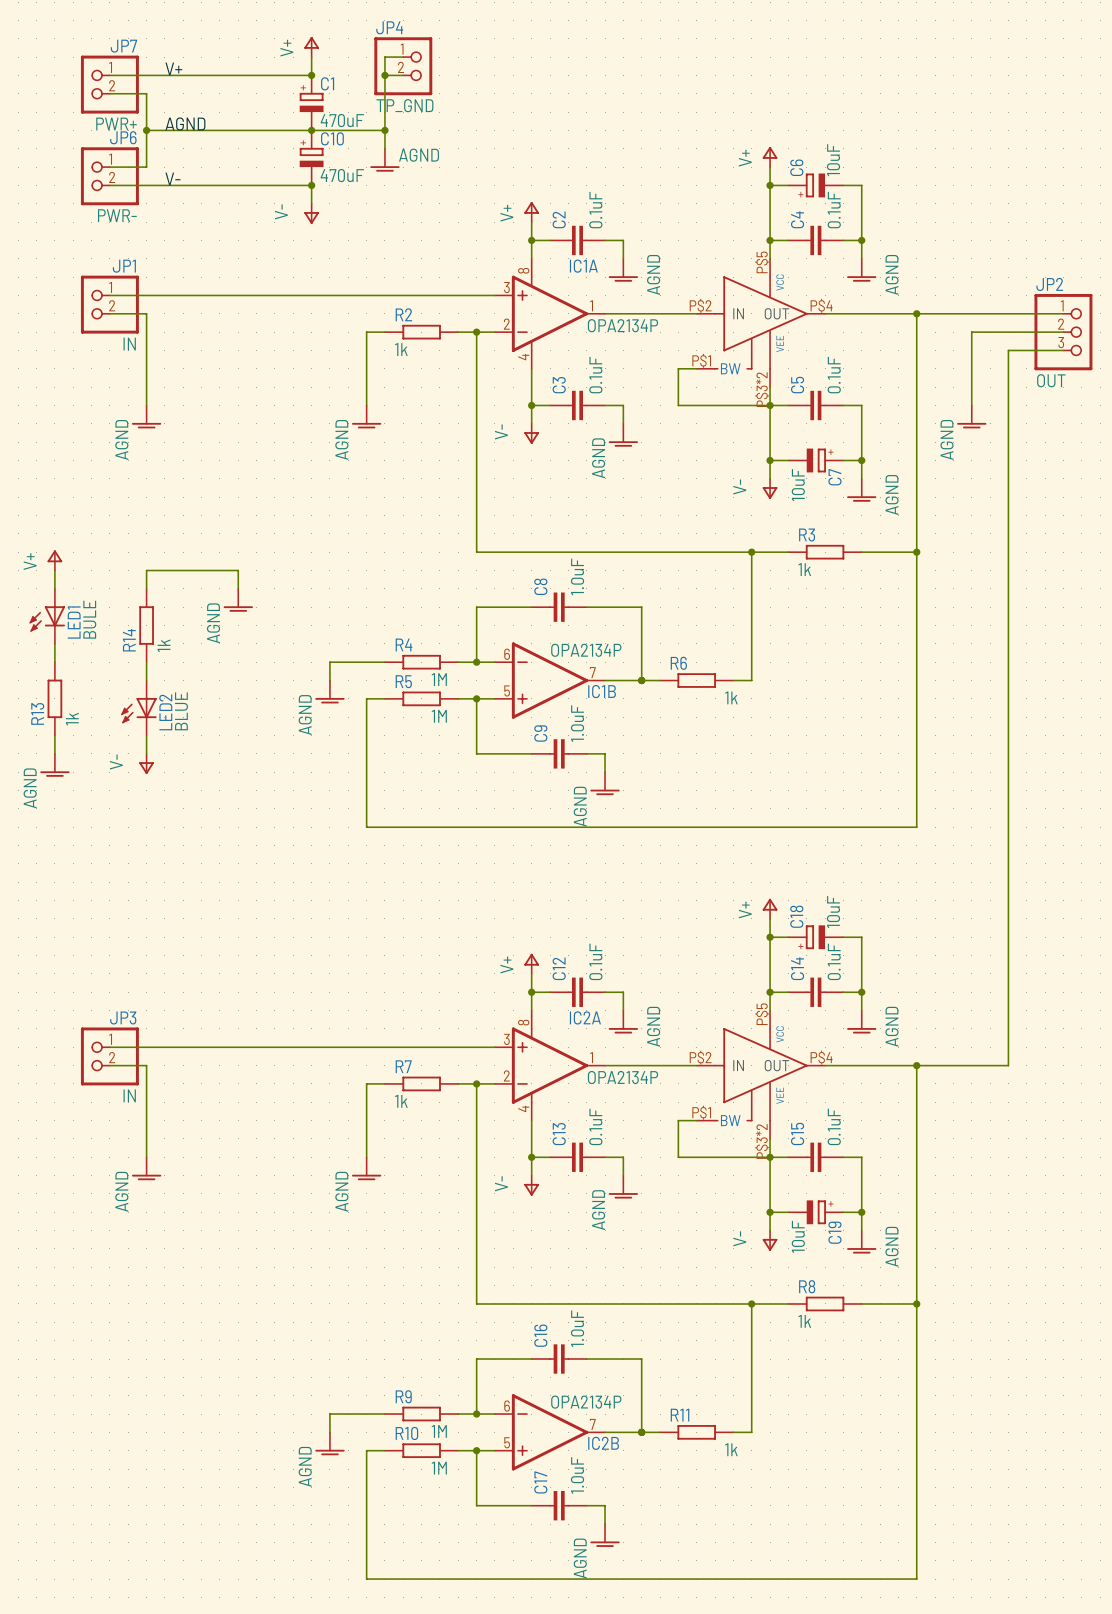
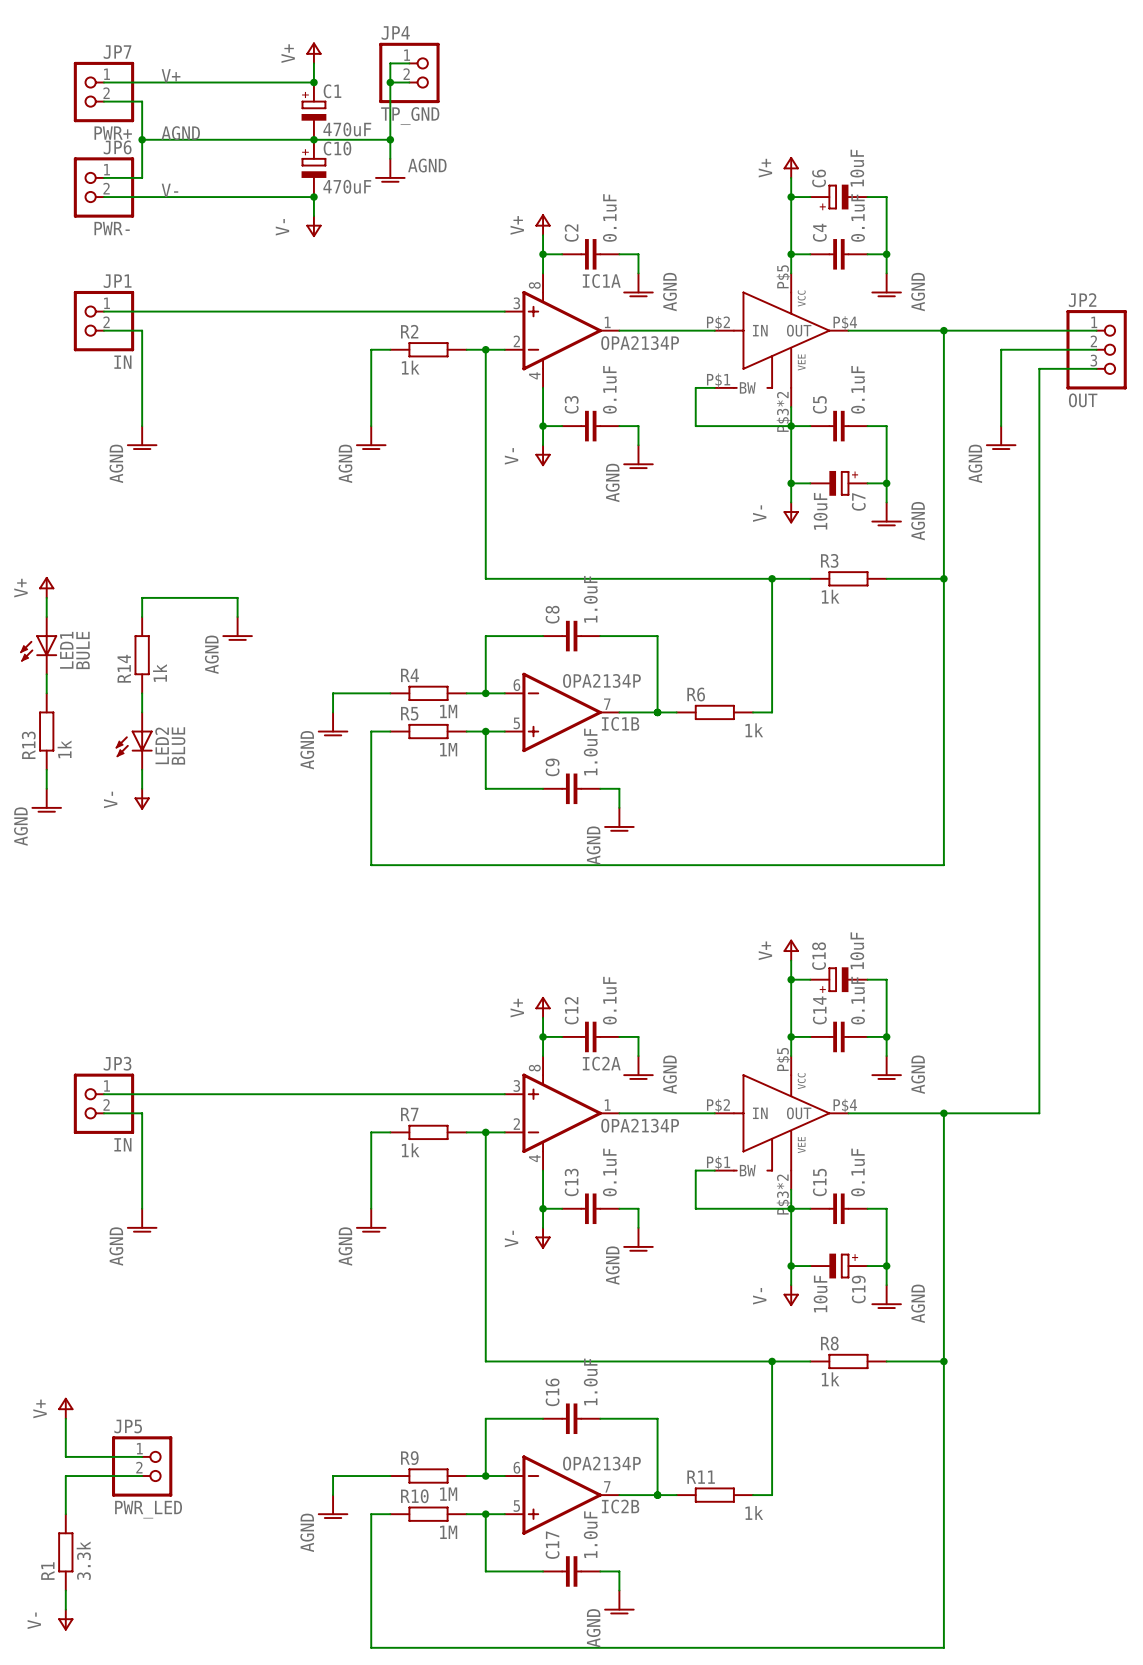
power symbol: none -> V+ (65, 1408)
wire: none -> (65, 1418) (65, 1456) (142, 1456)
JP5: none -> PWR_LED (142, 1466)
wire: none -> (142, 1476) (65, 1476) (65, 1514)
R1: none -> 3.3k (65, 1552)
wire: none -> (65, 1590) (65, 1609)
power symbol: none -> V- (65, 1620)

